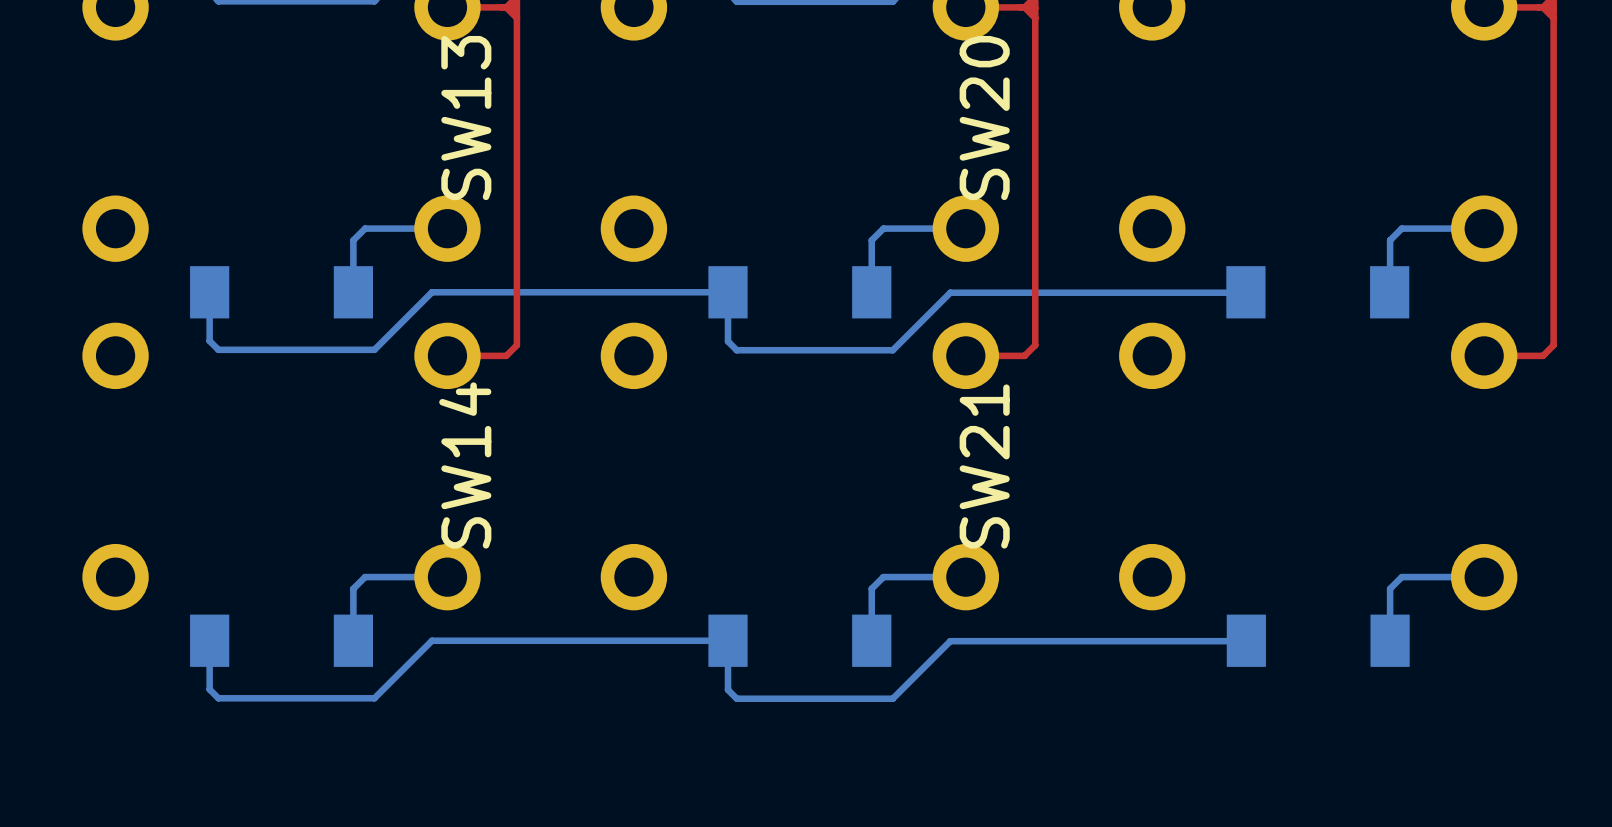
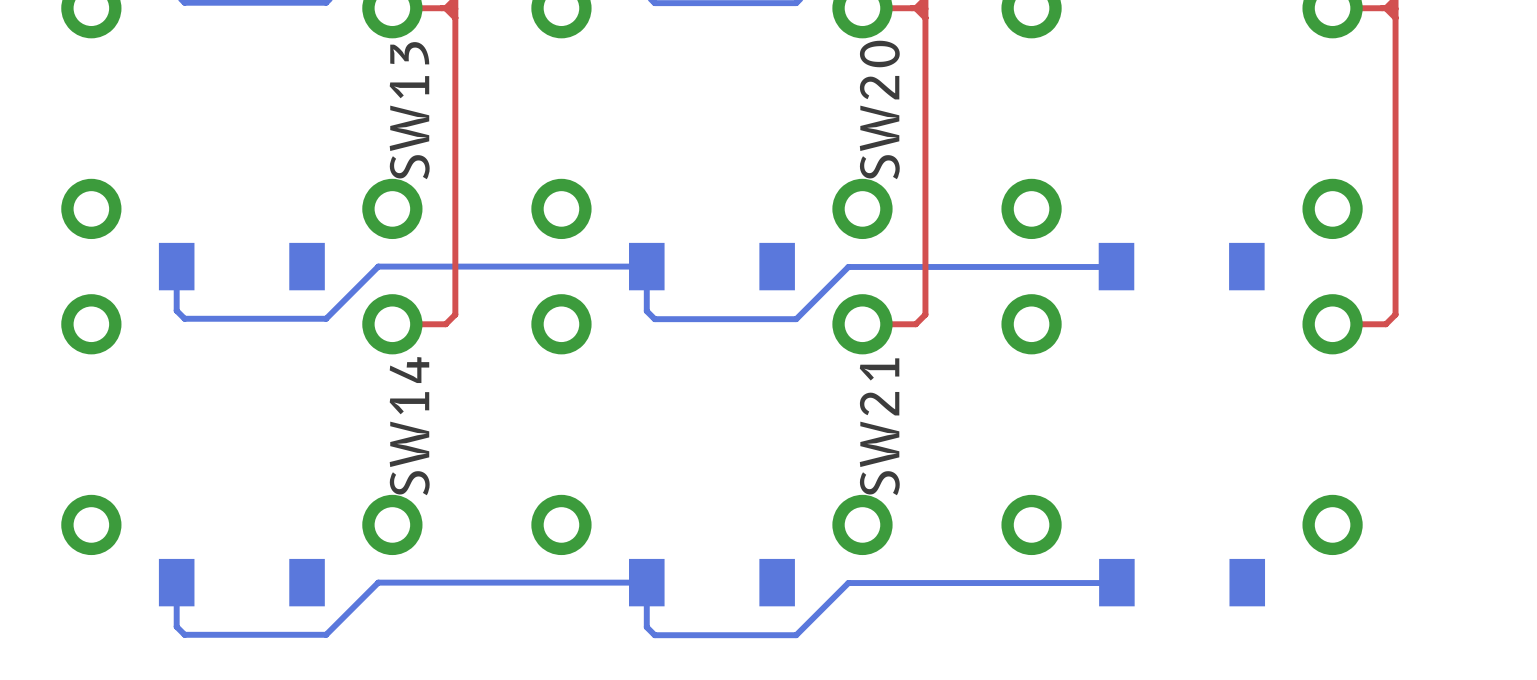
bottom track: (451, 228) (365, 228) (353, 240) (353, 292) -> none
bottom track: (969, 228) (883, 228) (871, 240) (871, 292) -> none
bottom track: (1487, 228) (1401, 228) (1390, 240) (1390, 292) -> none
bottom track: (451, 577) (365, 577) (353, 588) (353, 640) -> none
bottom track: (969, 577) (883, 577) (871, 588) (871, 640) -> none
bottom track: (1487, 577) (1401, 577) (1390, 588) (1390, 640) -> none

